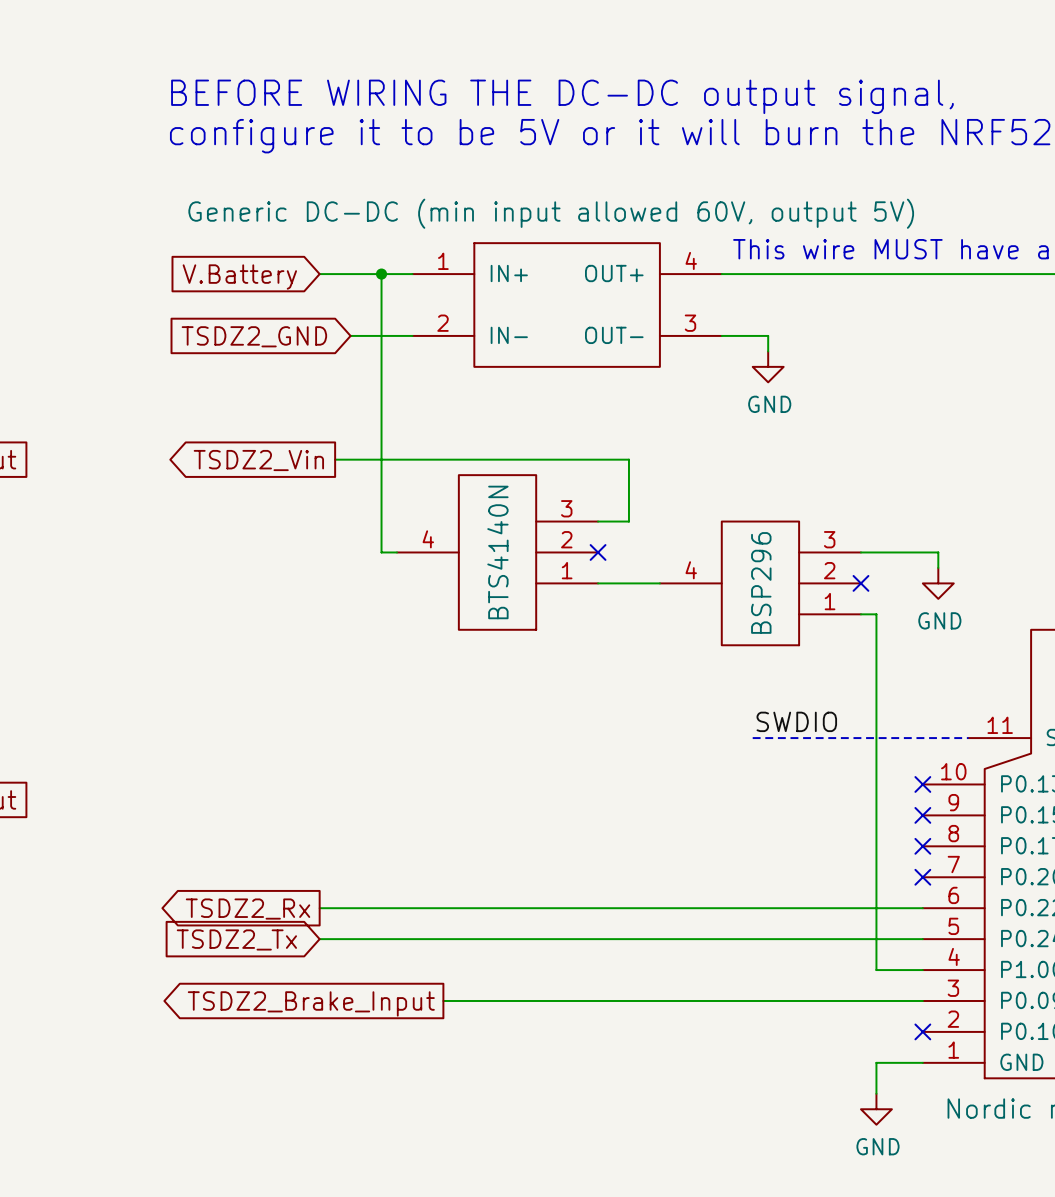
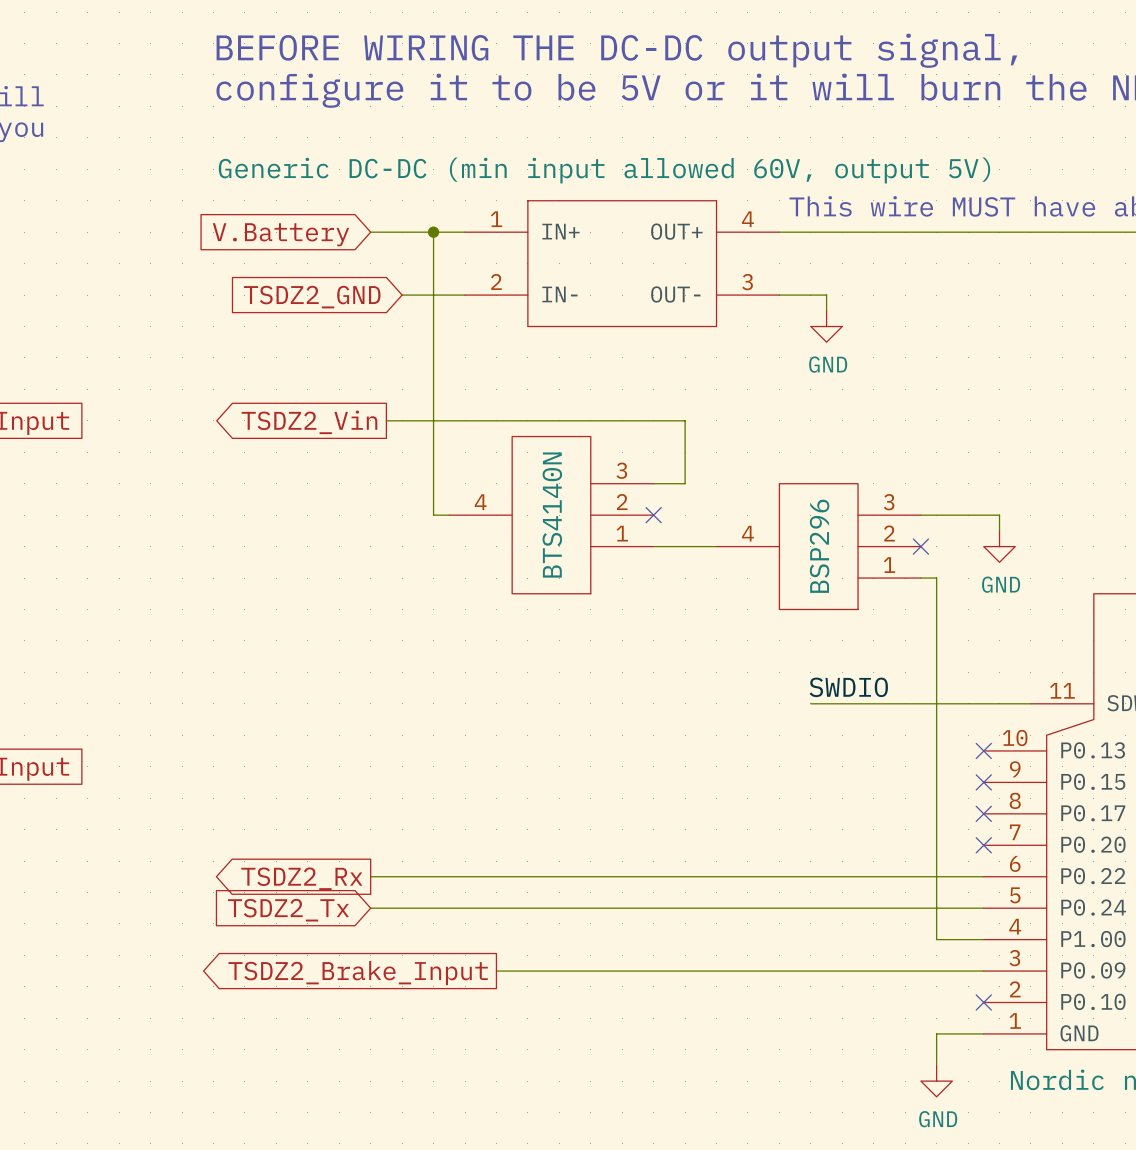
label position: SWDIO (796, 721) -> SWDIO (848, 687)
line: (752, 738) (969, 738) -> none

